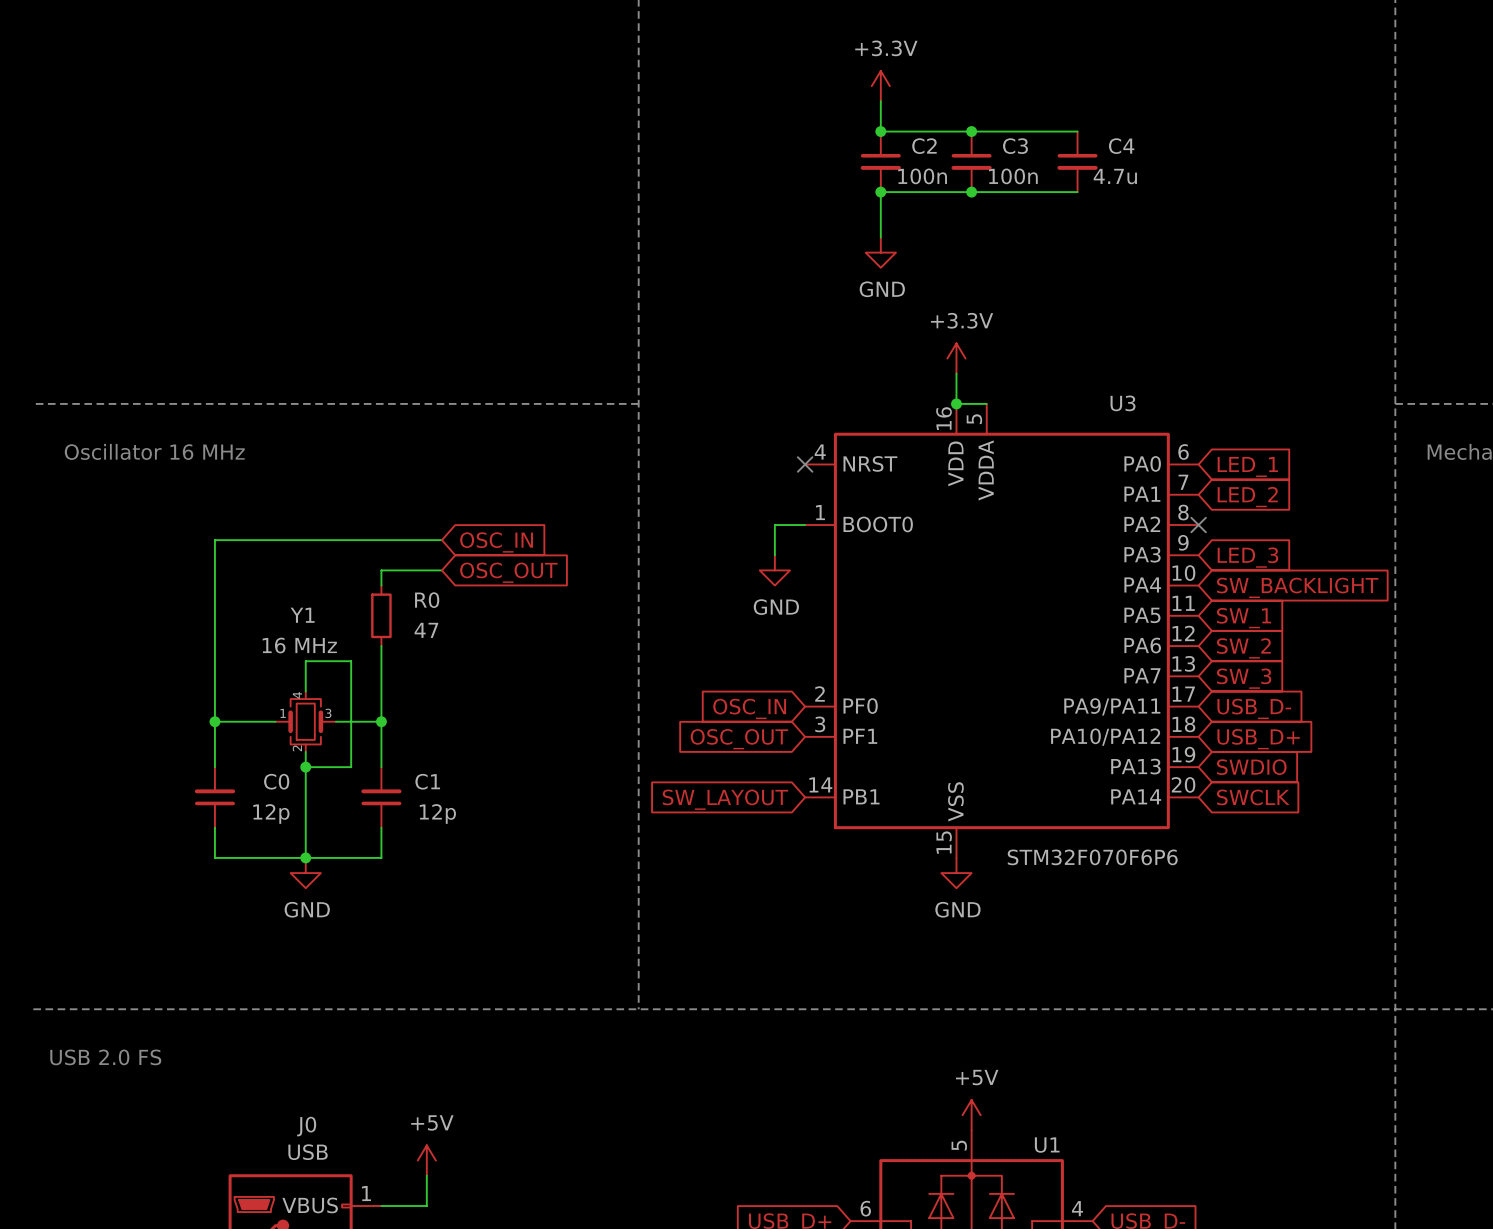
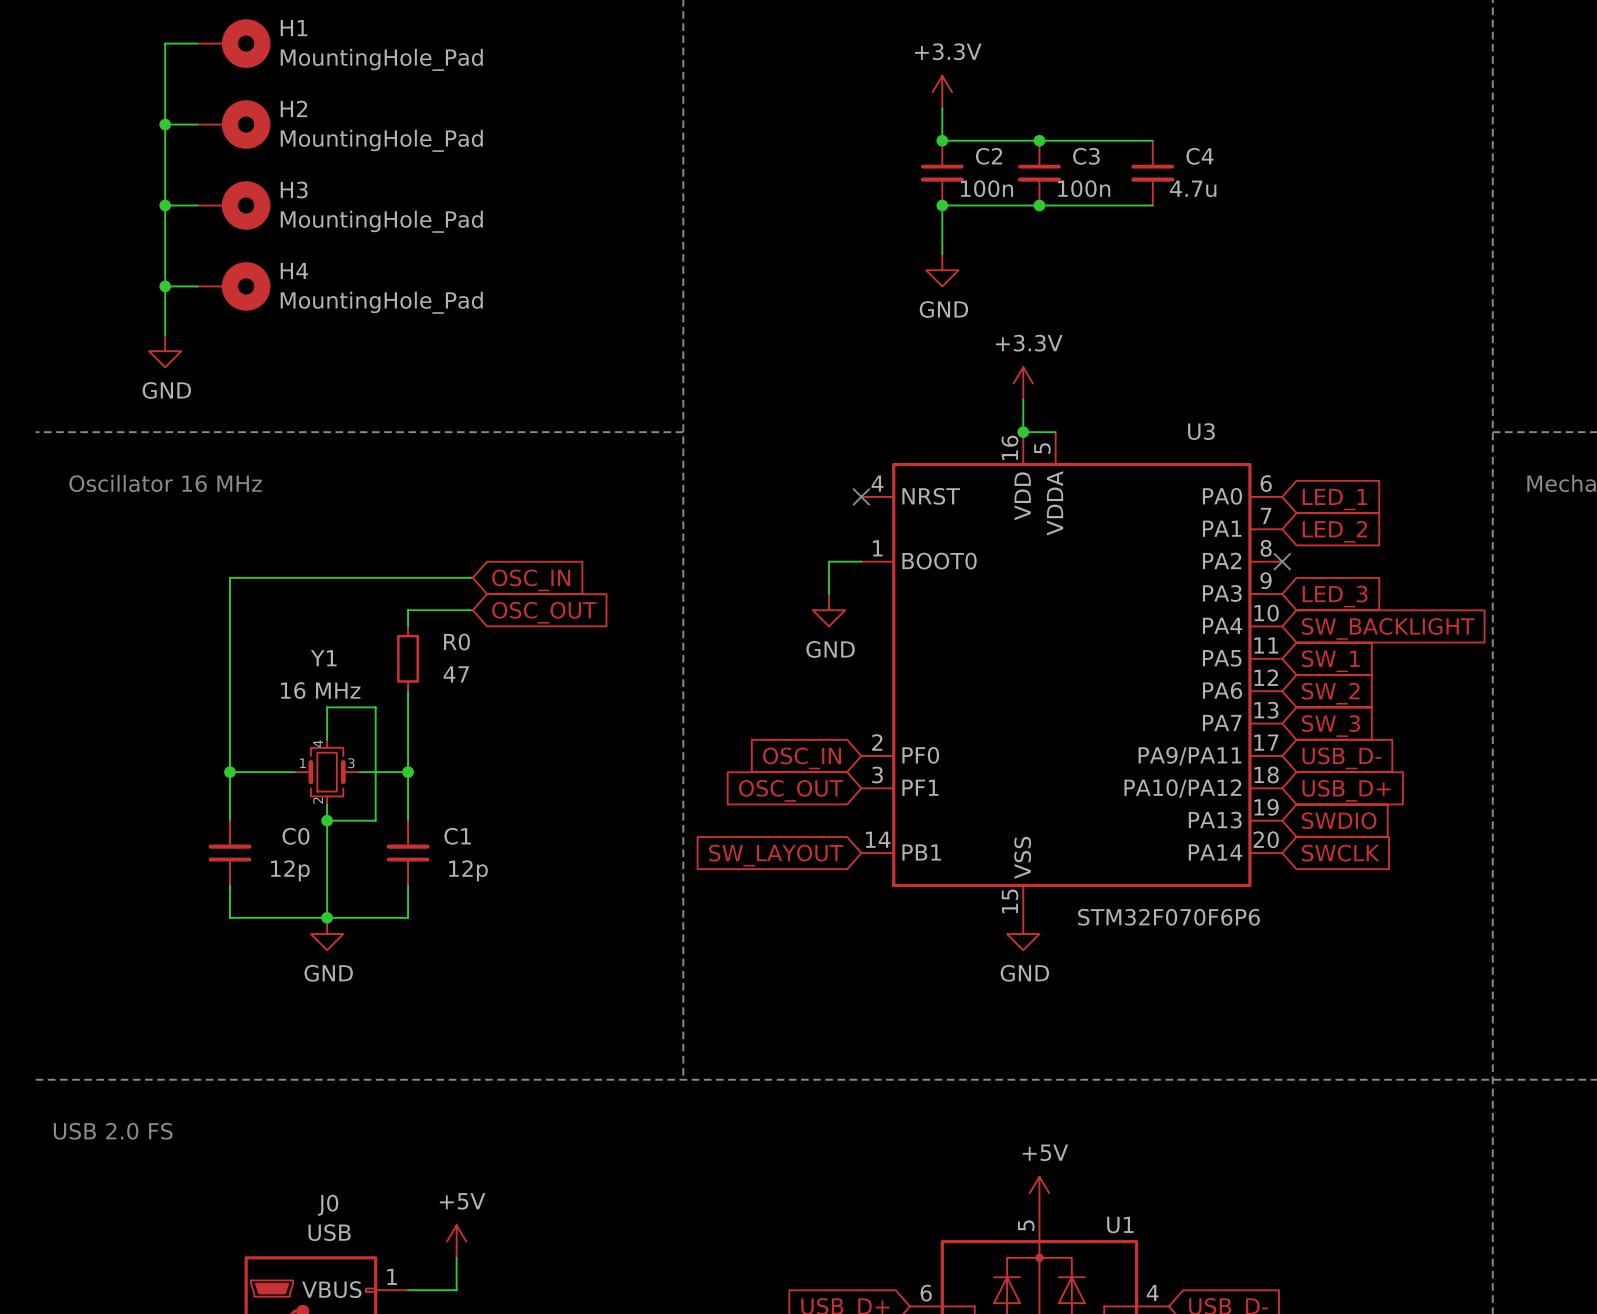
wire: none -> (197, 43) (165, 43) (165, 335)
H1: none -> MountingHole_Pad (234, 43)
wire: none -> (165, 124) (197, 124)
junction: none -> (165, 124)
H2: none -> MountingHole_Pad (234, 124)
wire: none -> (165, 205) (197, 205)
junction: none -> (165, 205)
H3: none -> MountingHole_Pad (234, 205)
wire: none -> (165, 286) (197, 286)
junction: none -> (165, 286)
H4: none -> MountingHole_Pad (234, 286)
power symbol: none -> GND (165, 351)

